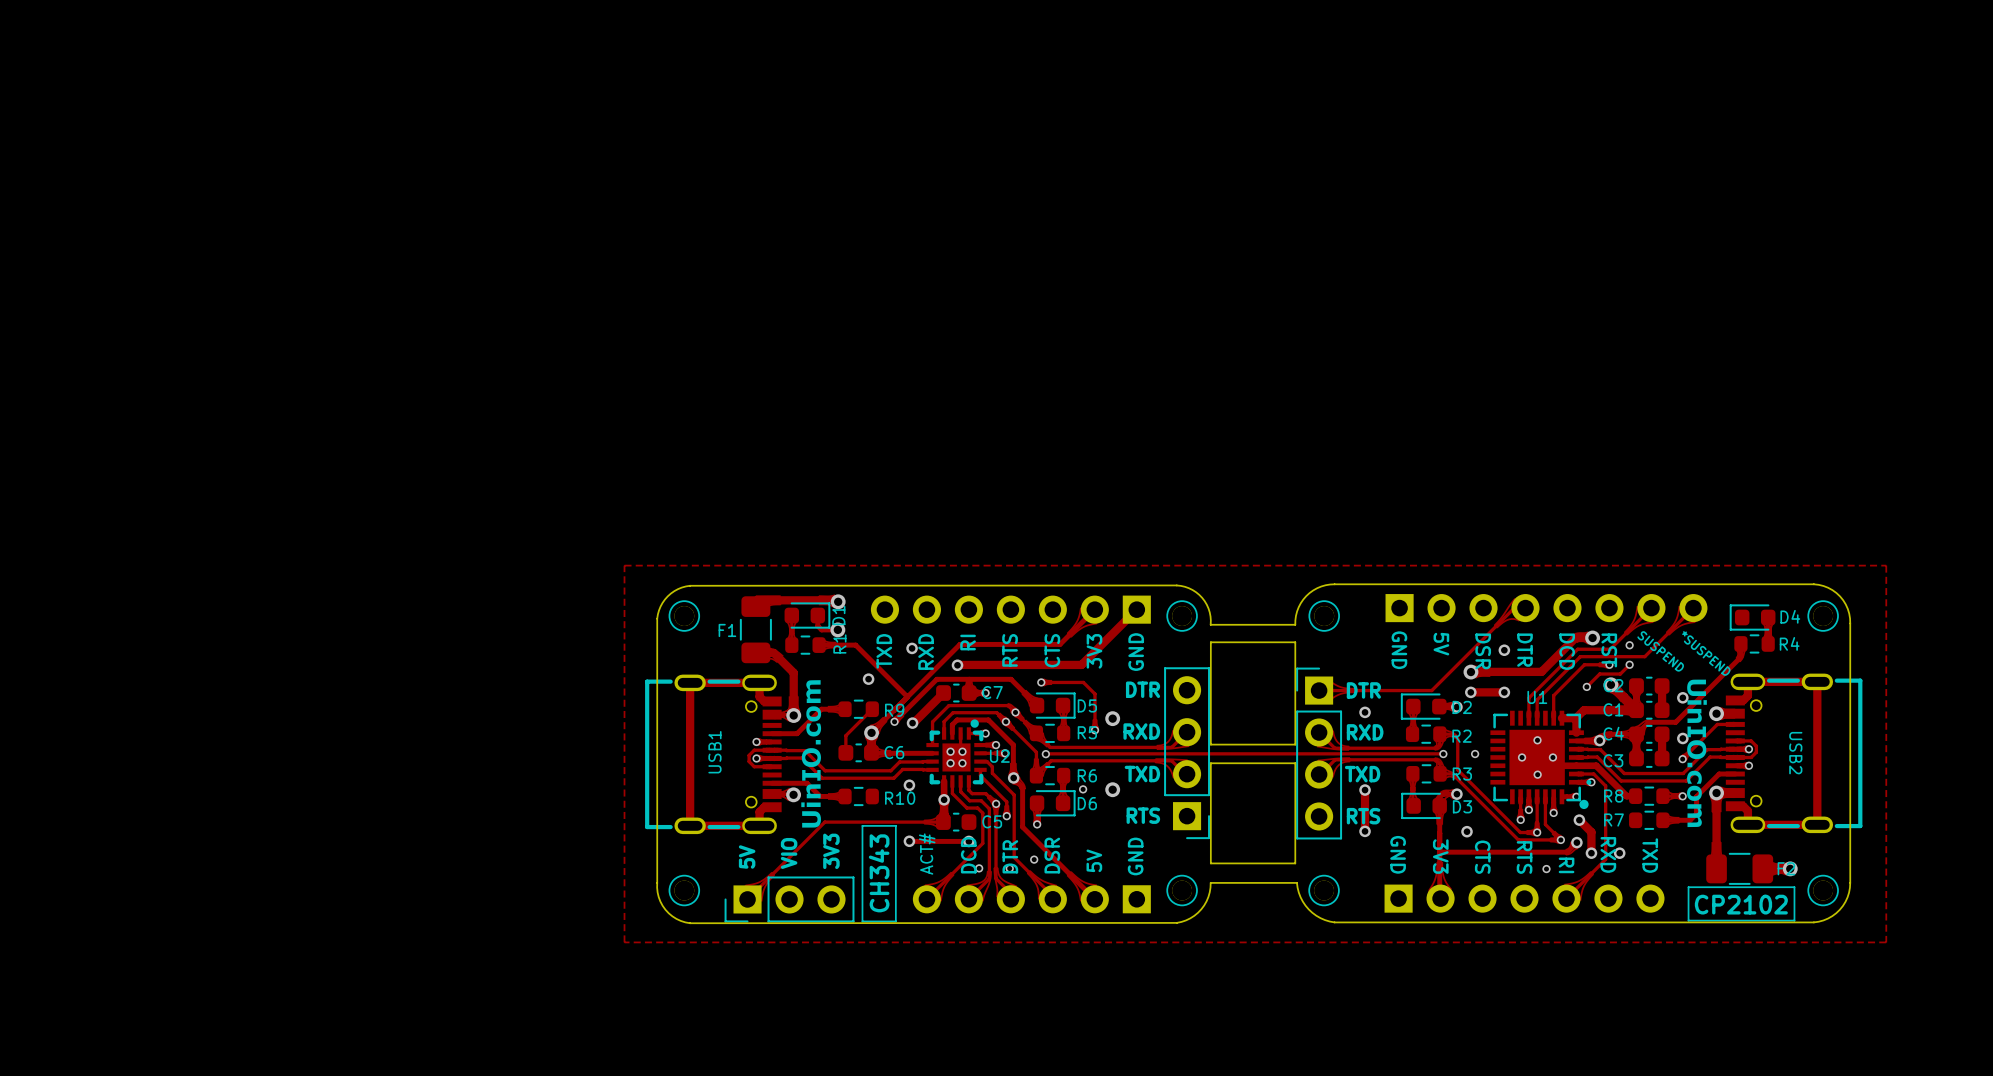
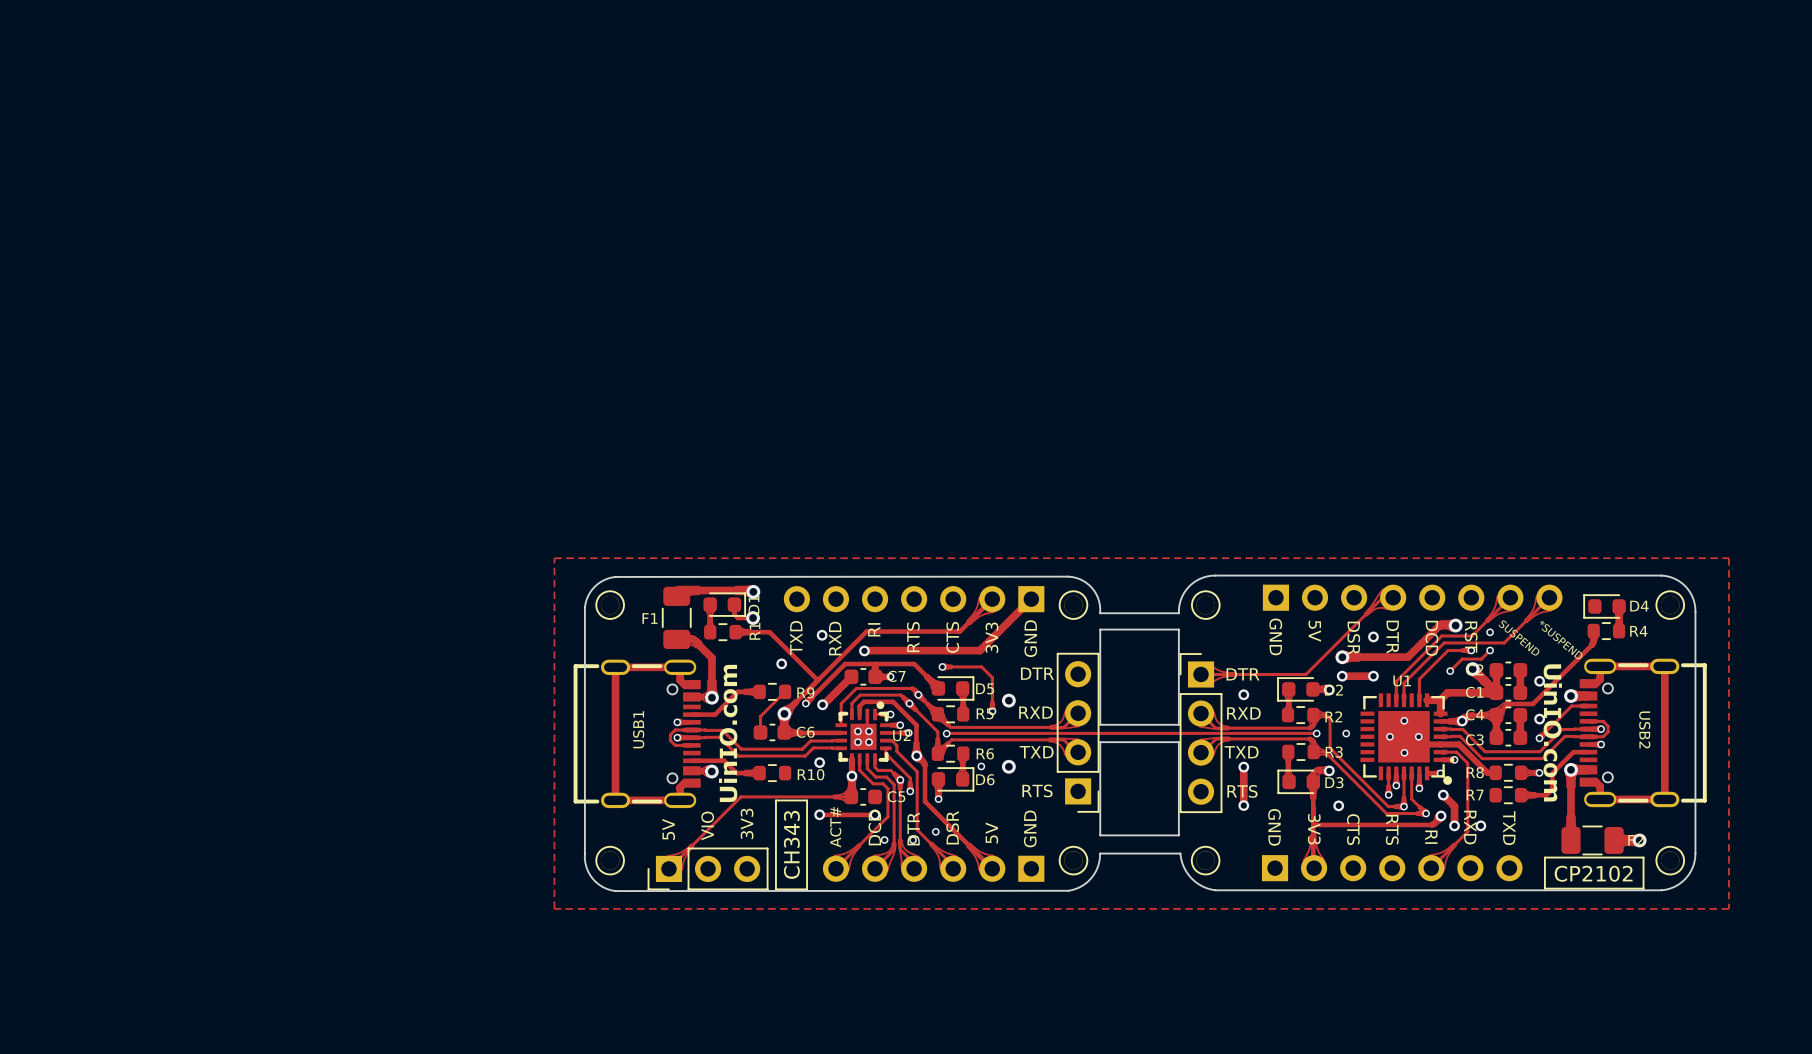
via: (1546, 869) -> none

